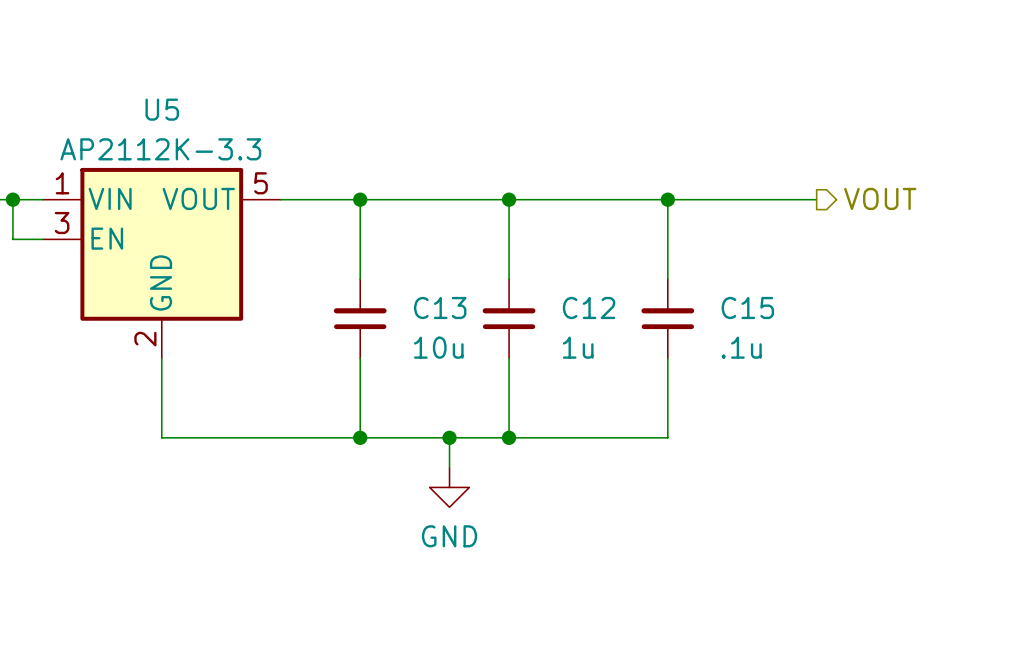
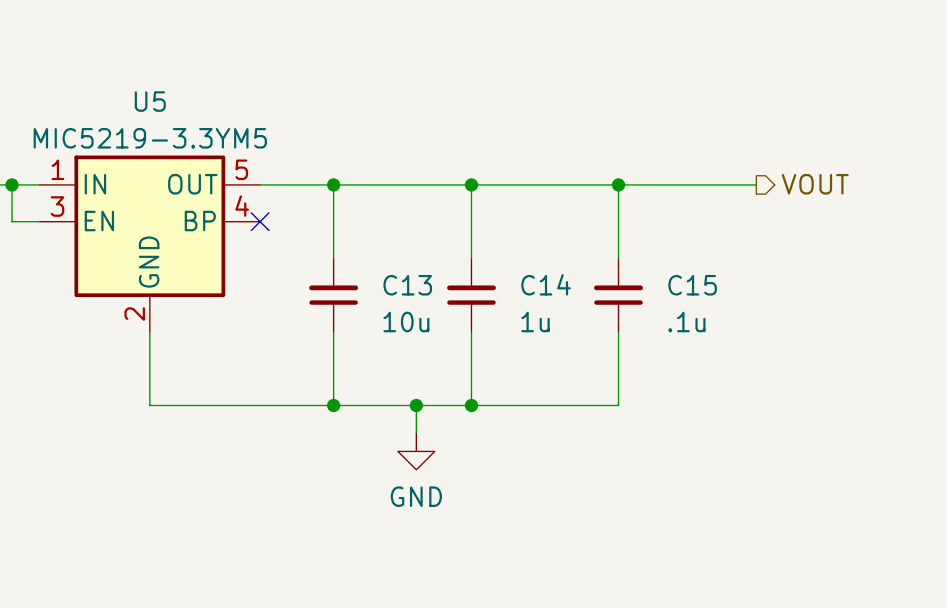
U5 value: AP2112K-3.3 (160, 149) -> MIC5219-3.3YM5 (150, 138)
U5 symbol: [42, 167, 281, 359] -> [39, 155, 261, 332]
no-connect mark: none -> (260, 221)
C12 name: C12 (589, 307) -> C14 (546, 284)

